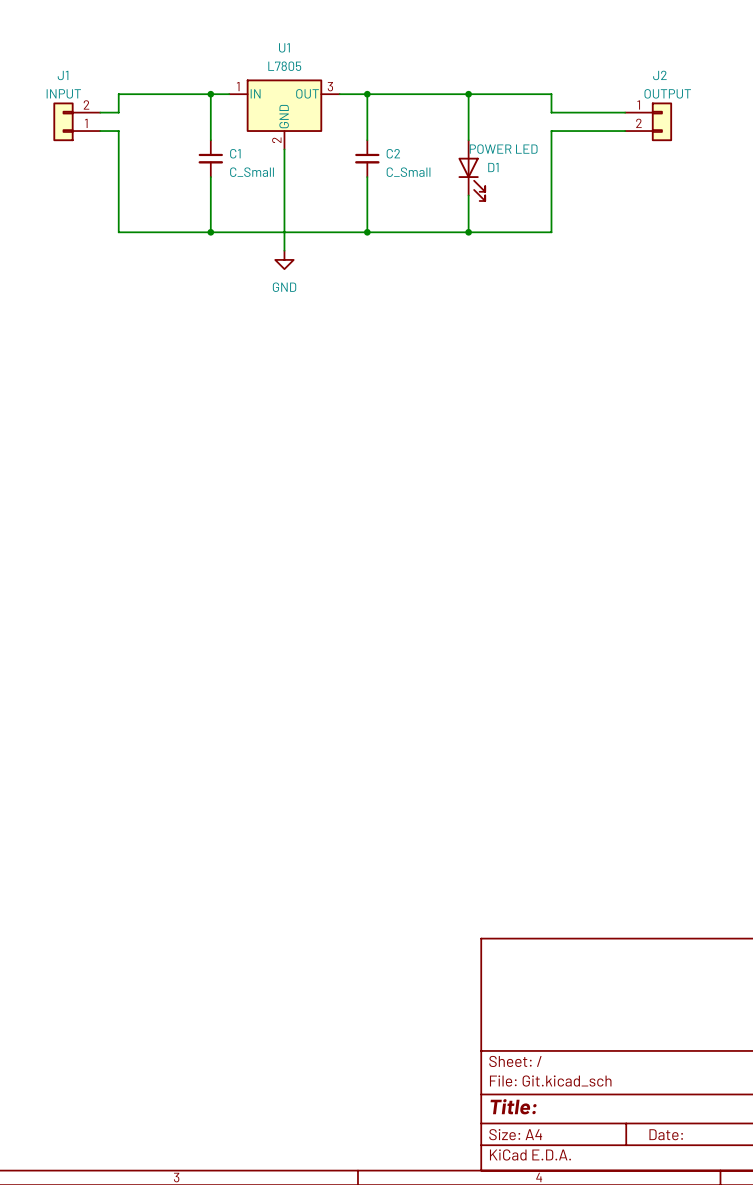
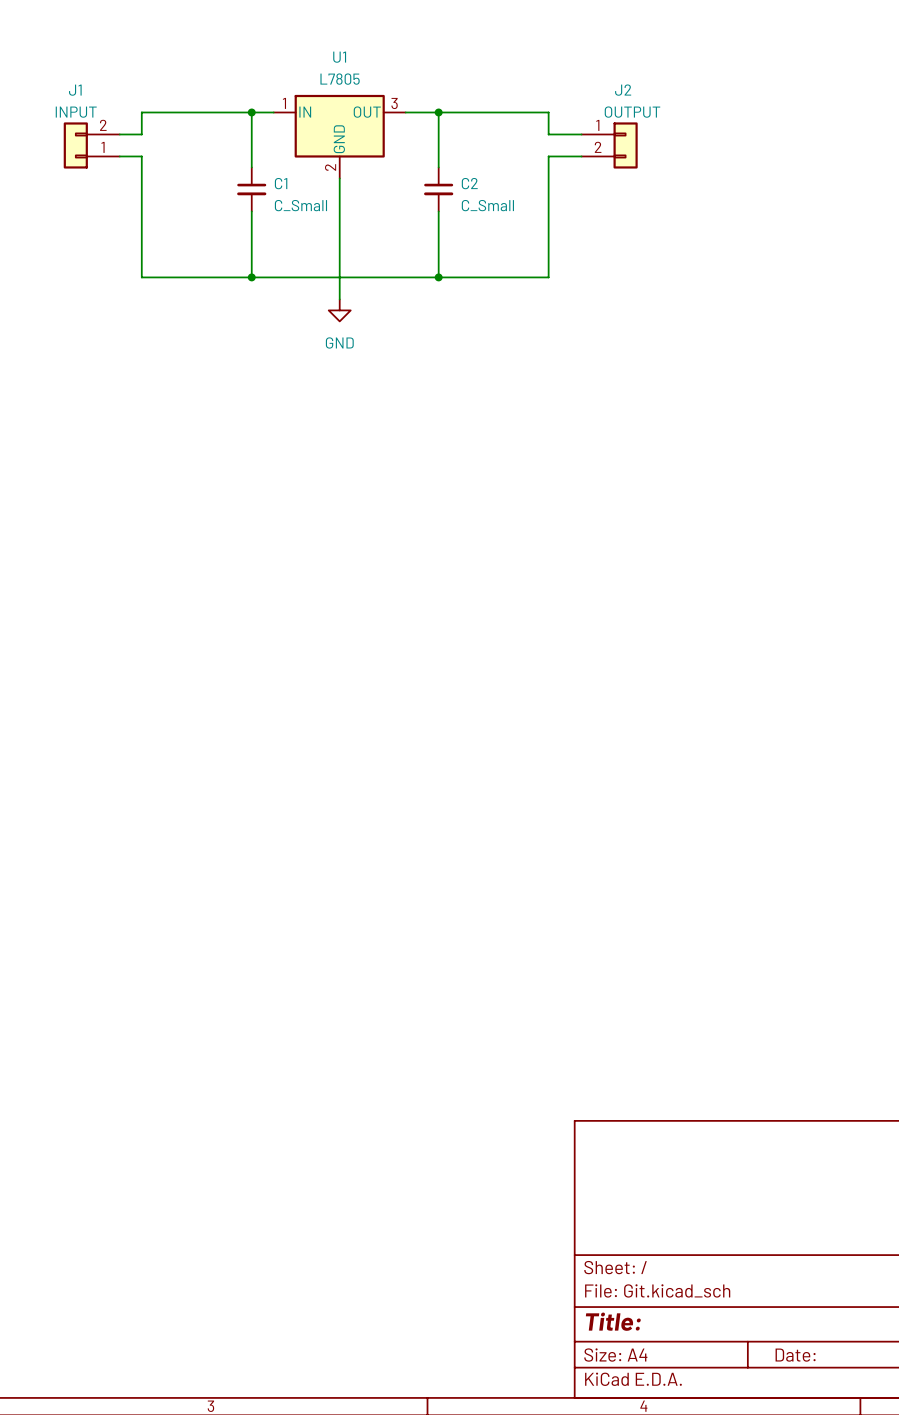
wire: (459, 94) (551, 94) (551, 112) (625, 112) -> (548, 112) (548, 134) (581, 134)
wire: (468, 94) (468, 140) -> none
junction: (468, 94) -> none
J2 position: (648, 121) -> (609, 145)
wire: (625, 131) (551, 131) (551, 232) (459, 232) -> (581, 156) (548, 156) (548, 277)
D1: POWER LED (471, 170) -> none
wire: (468, 195) (468, 232) -> none
junction: (468, 232) -> none

